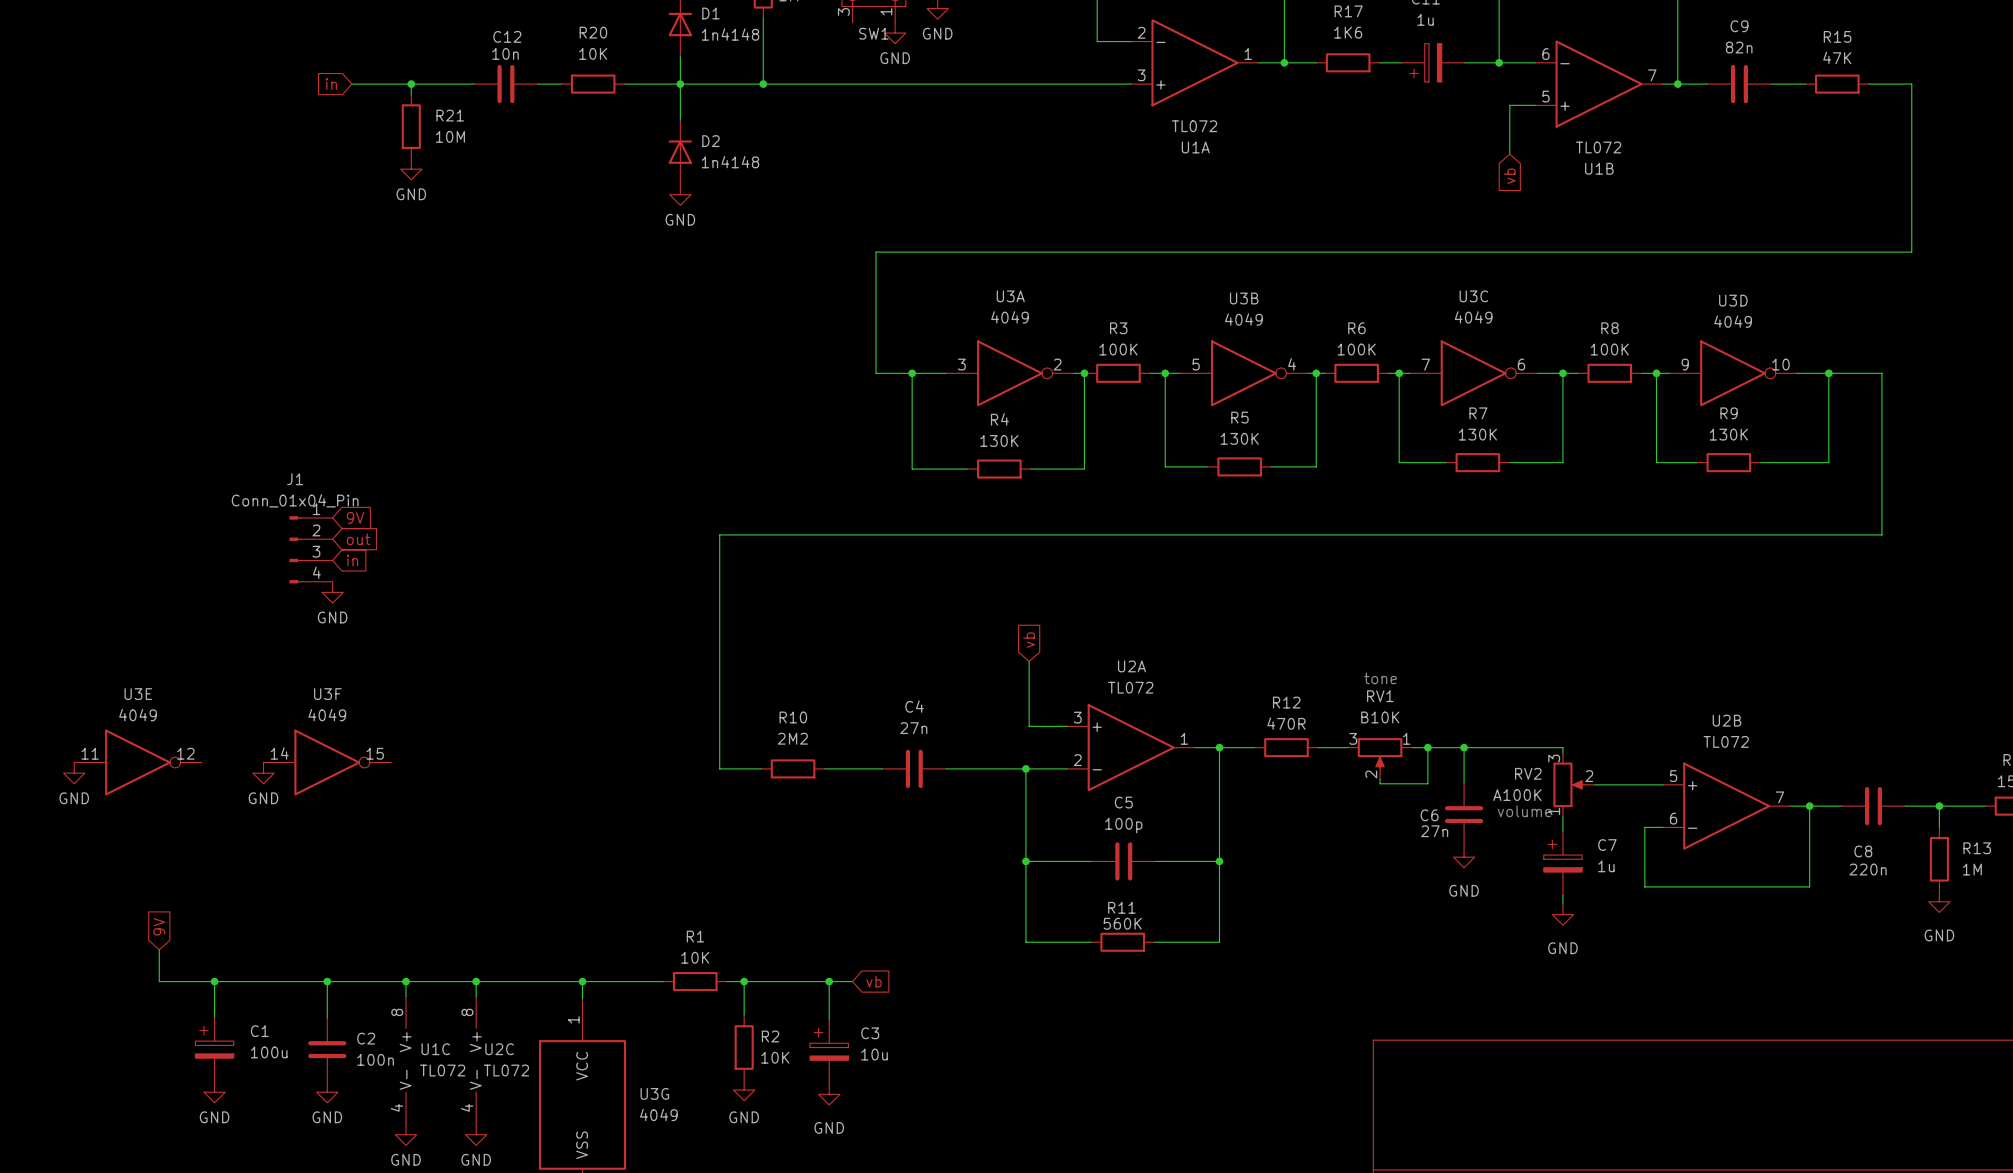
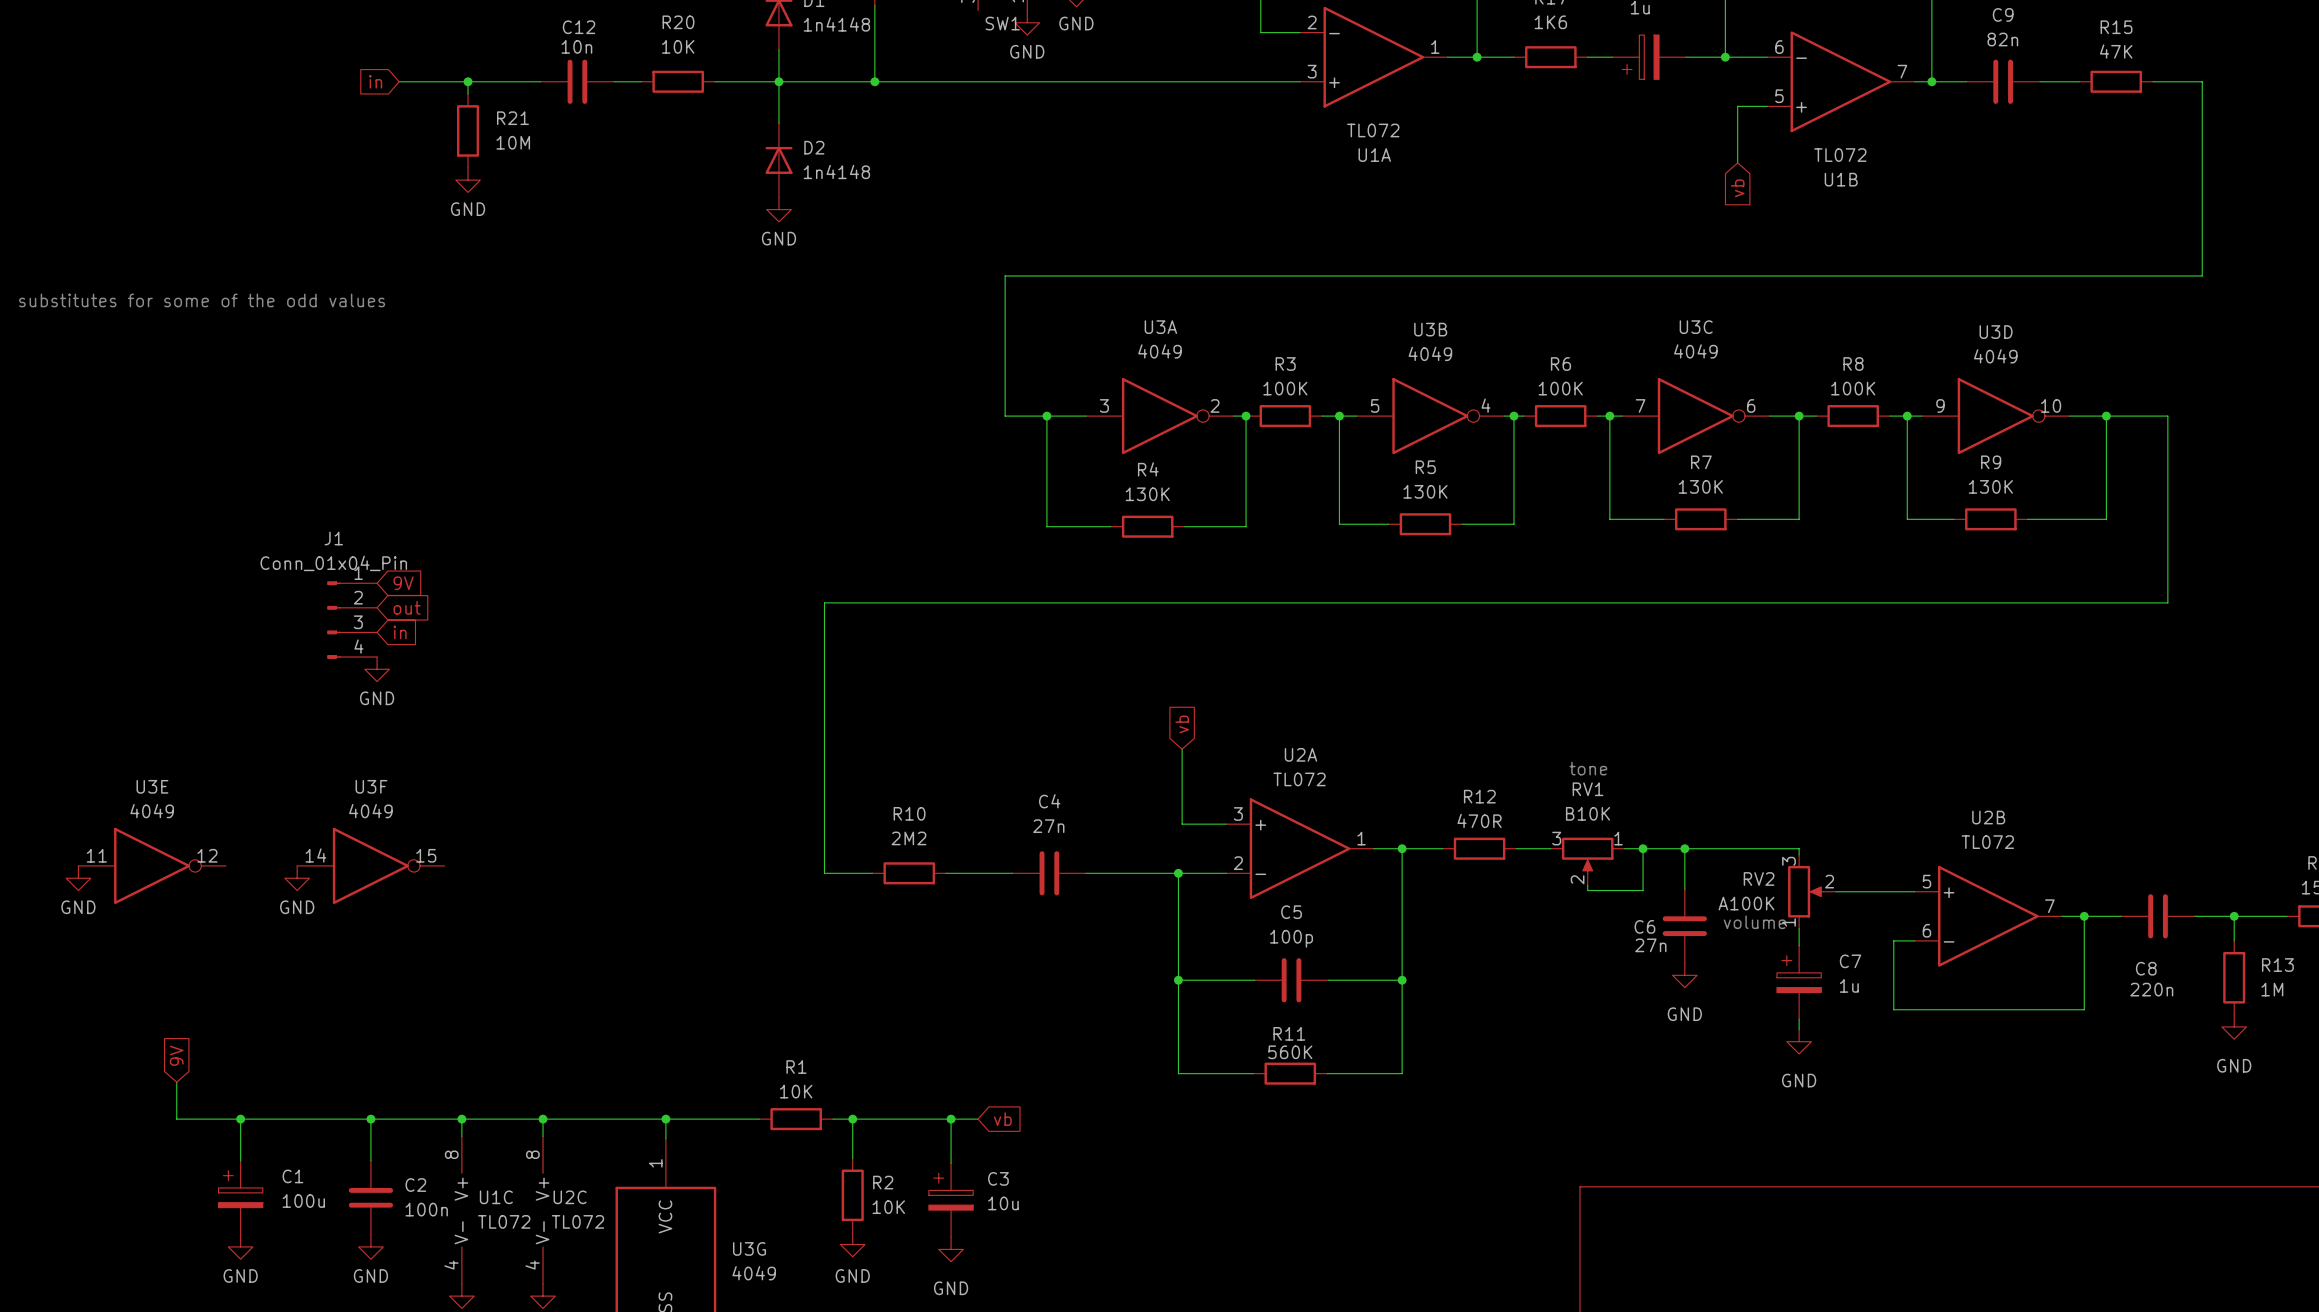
text: none -> substitutes for some of the odd values (202, 300)

